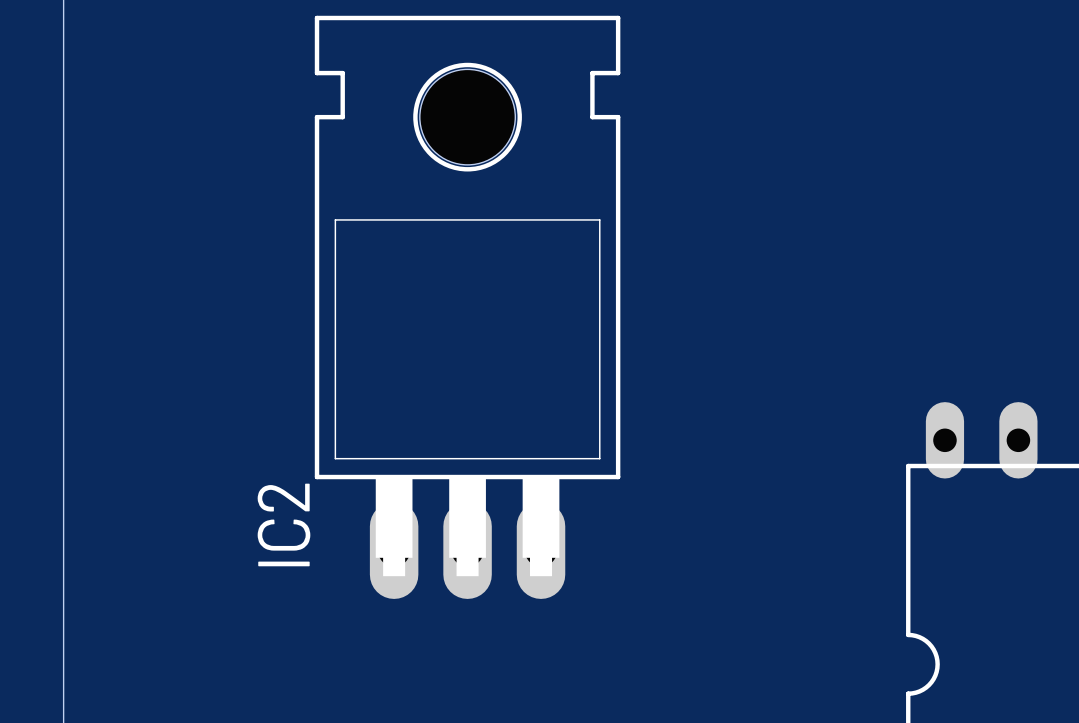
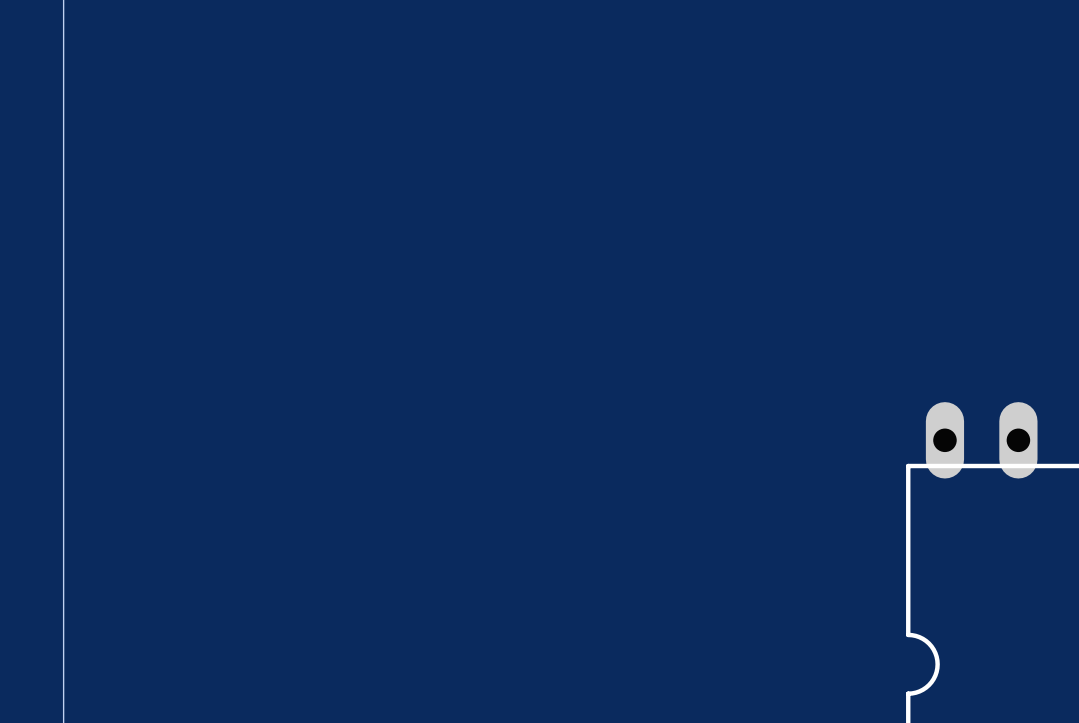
IC2: (467, 307) -> none

